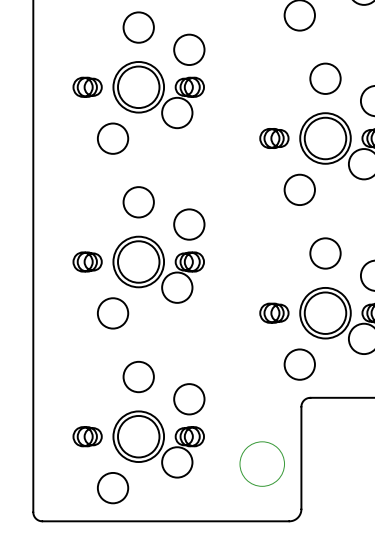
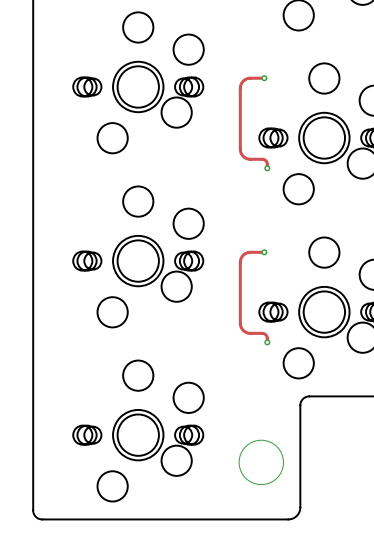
track: none -> (264, 78) (248, 78) (240, 84) (240, 149) (241, 154) (246, 158) (265, 160) (267, 168)
via: none -> (264, 78)
via: none -> (267, 168)
track: none -> (264, 252) (248, 252) (240, 259) (240, 323) (241, 328) (246, 332) (265, 334) (267, 342)
via: none -> (264, 252)
via: none -> (267, 342)

